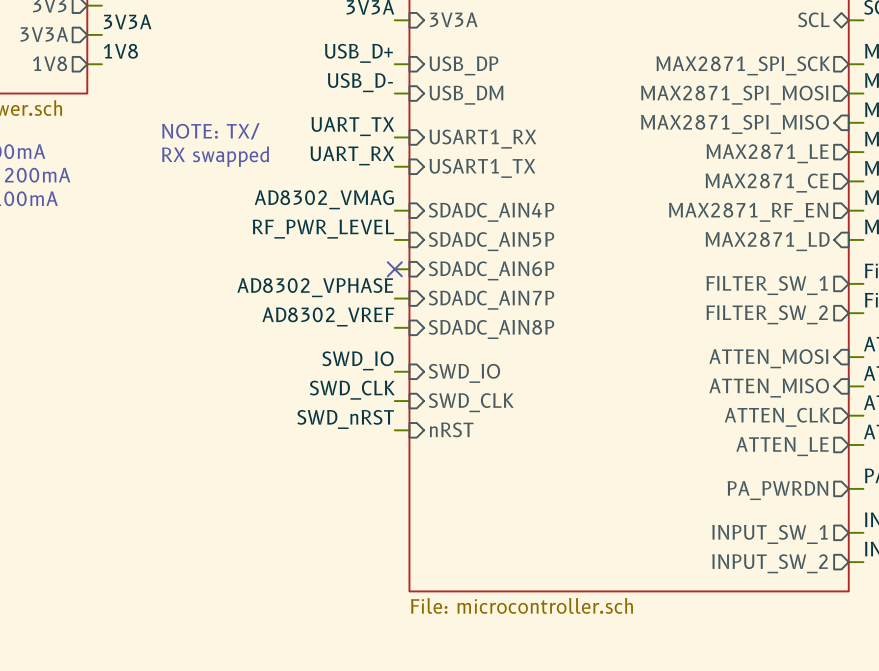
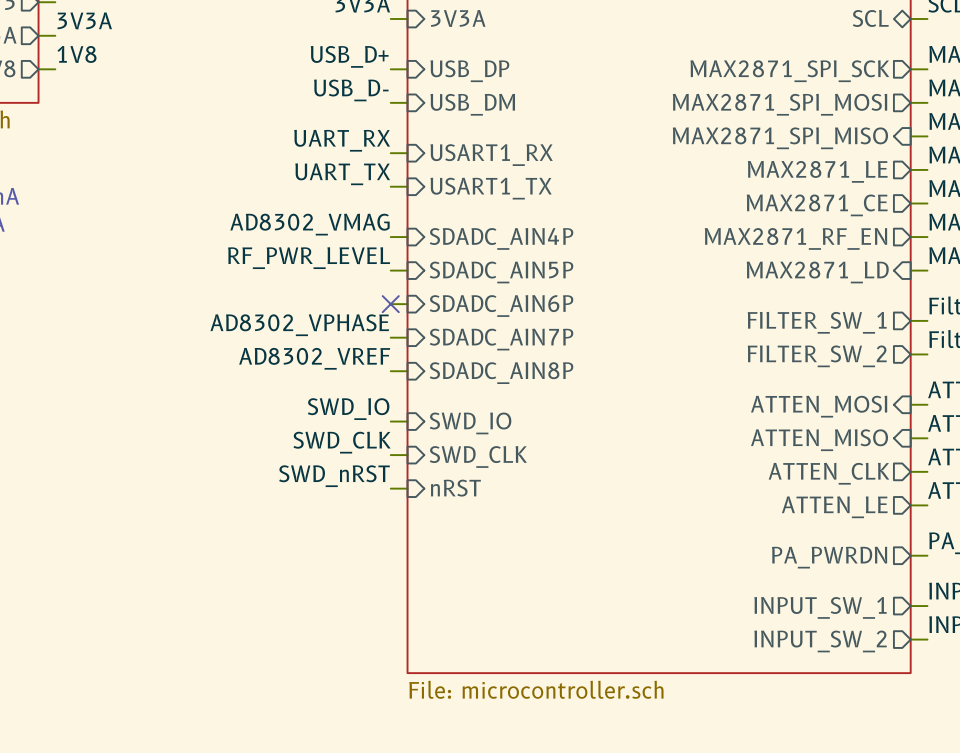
label: UART_TX (352, 126) -> UART_RX (342, 140)
text: NOTE: TX/ (210, 131) -> none
label: UART_RX (352, 155) -> UART_TX (342, 174)
text: RX swapped (215, 156) -> none

